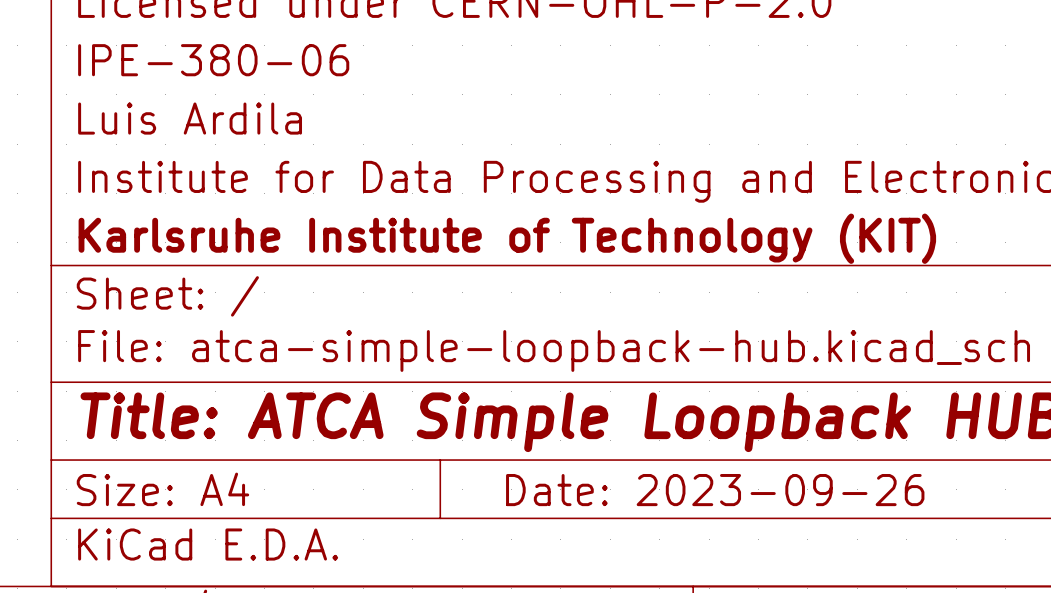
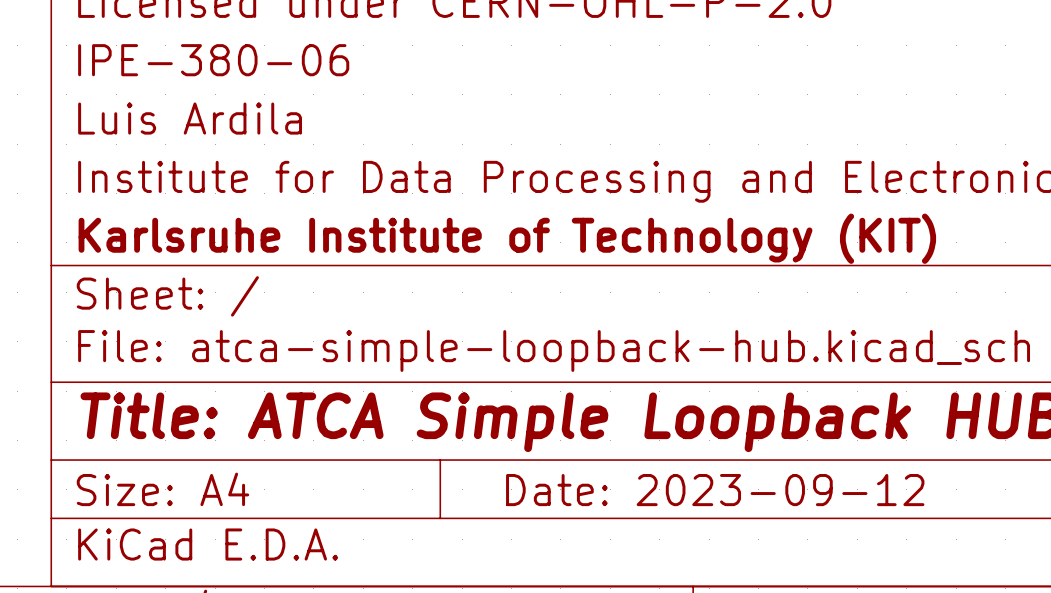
title block: Date: 2023-09-26 (715, 490) -> Date: 2023-09-12 (715, 490)

